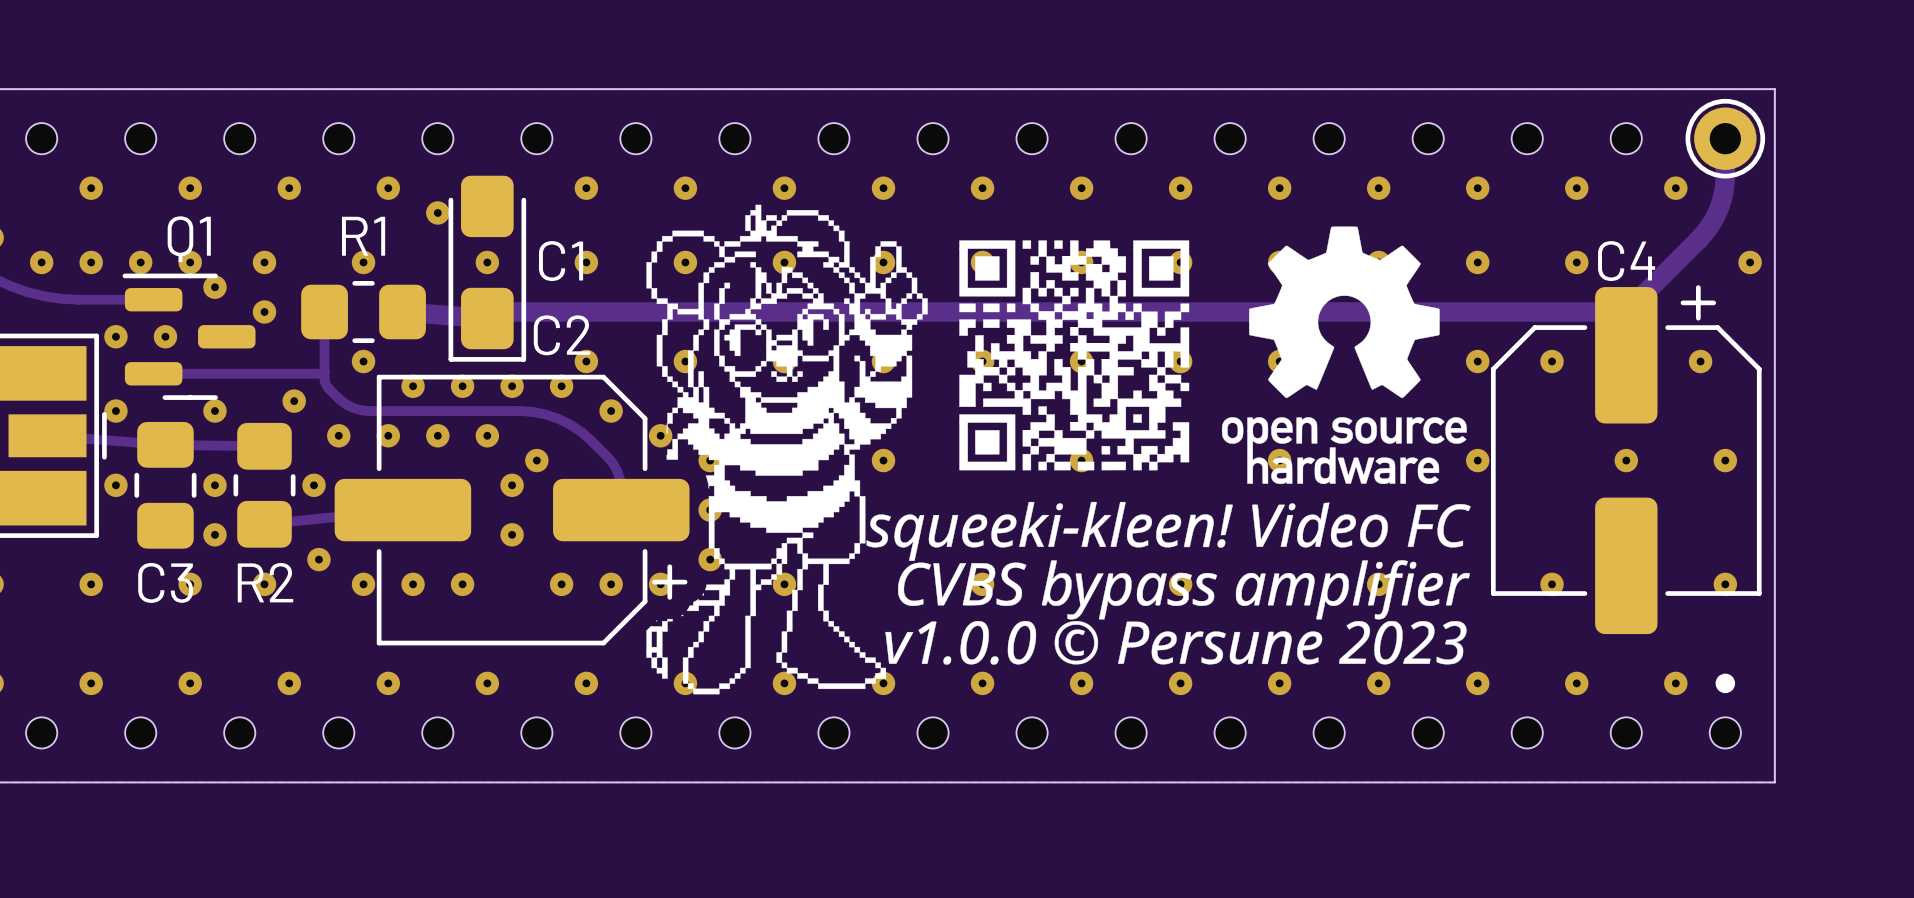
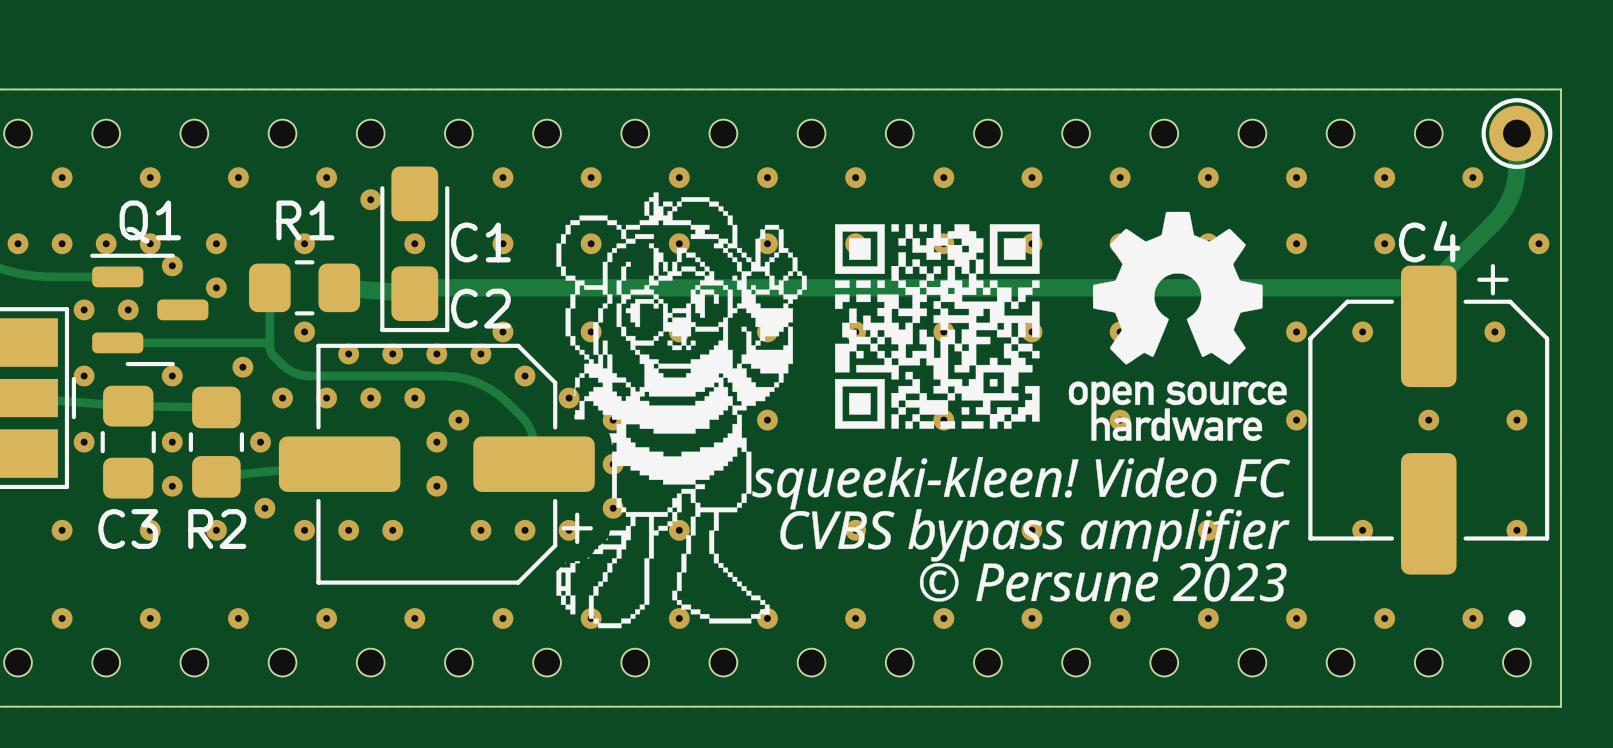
drawing shape: [646, 204, 1471, 695] -> [556, 192, 1291, 629]

